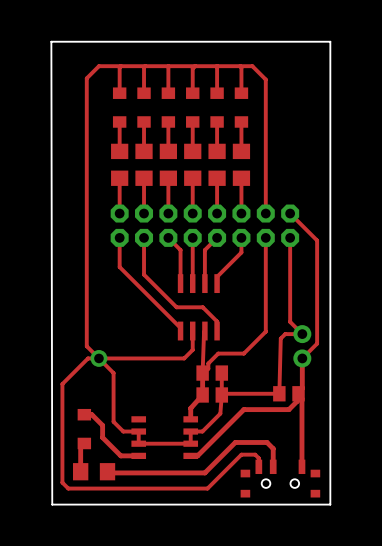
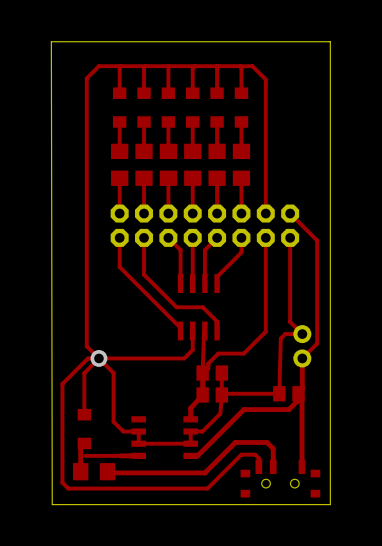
top track: none -> (98, 358) (84, 373) (84, 409)
top track: (84, 414) (91, 414) (102, 425) (102, 437) (120, 455) -> (85, 455) (120, 455)

